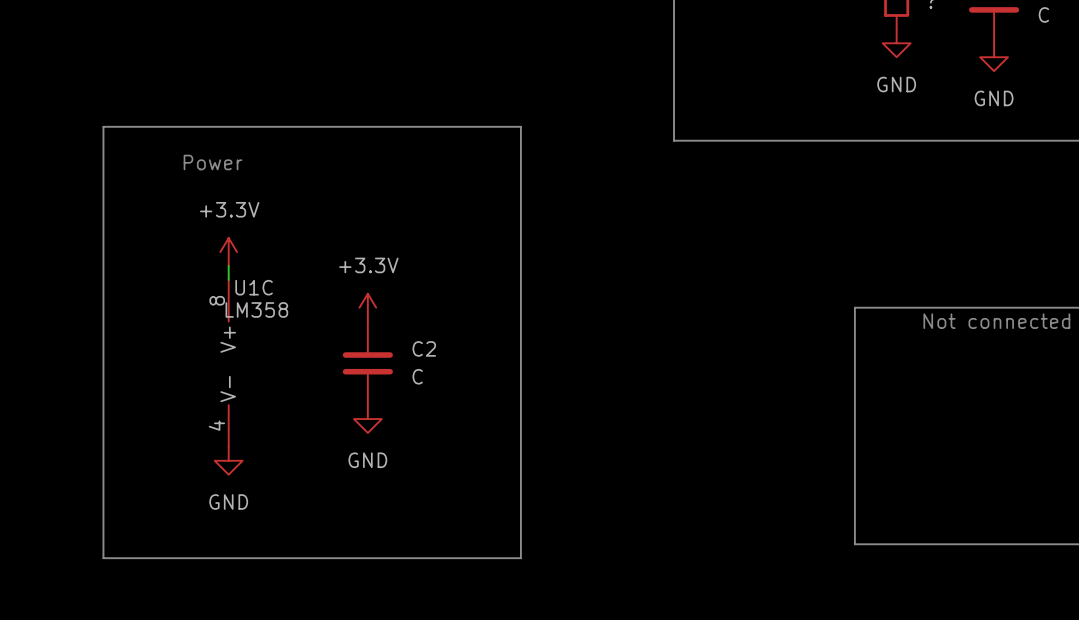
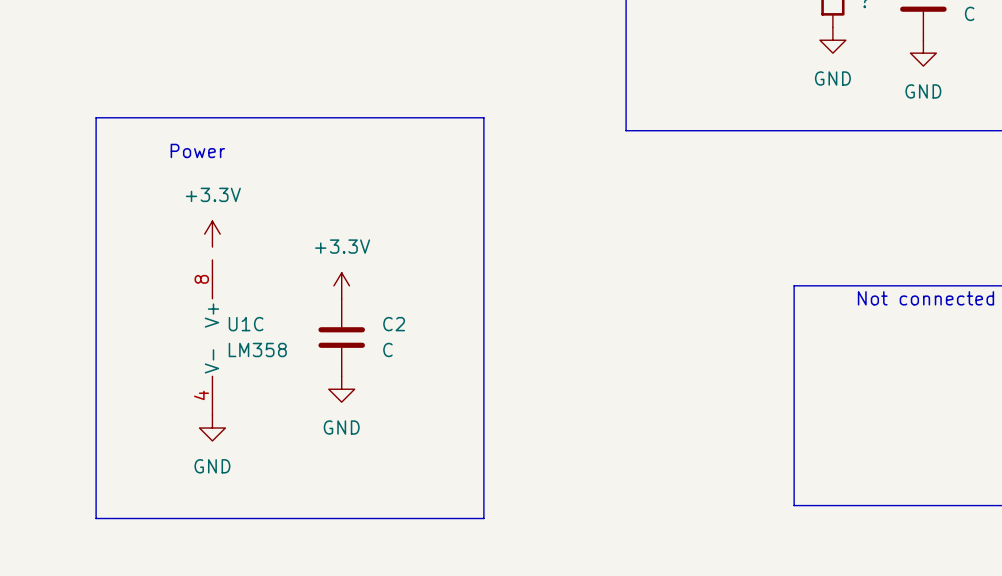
wire: (228, 265) (228, 279) -> none
U1C name position: U1C (254, 287) -> U1C (246, 324)
U1C value position: LM358 (256, 309) -> LM358 (257, 349)

